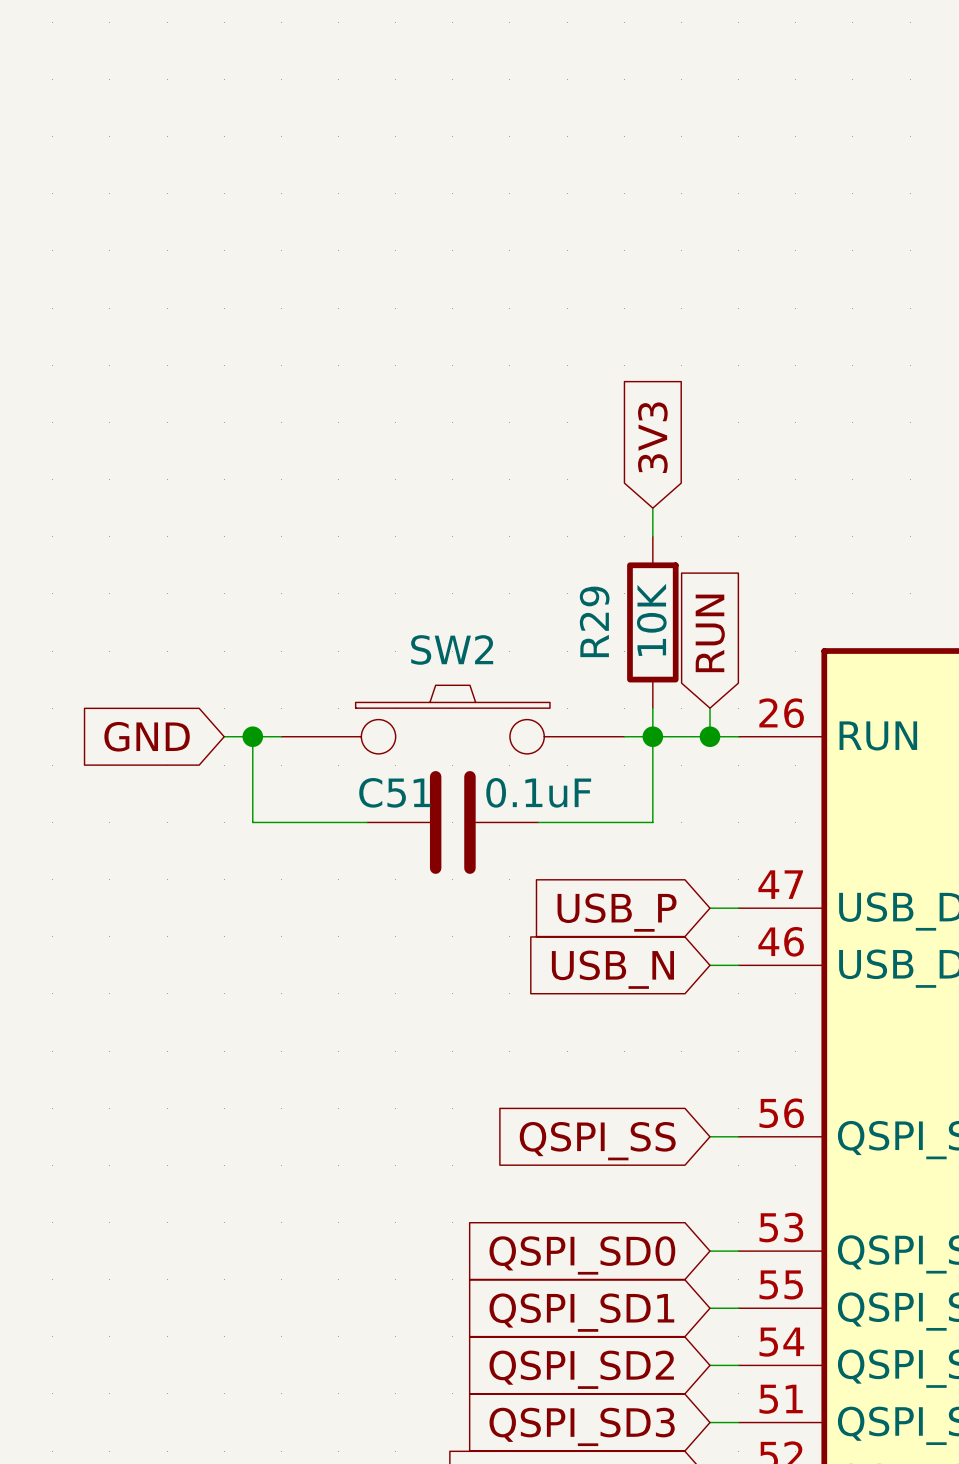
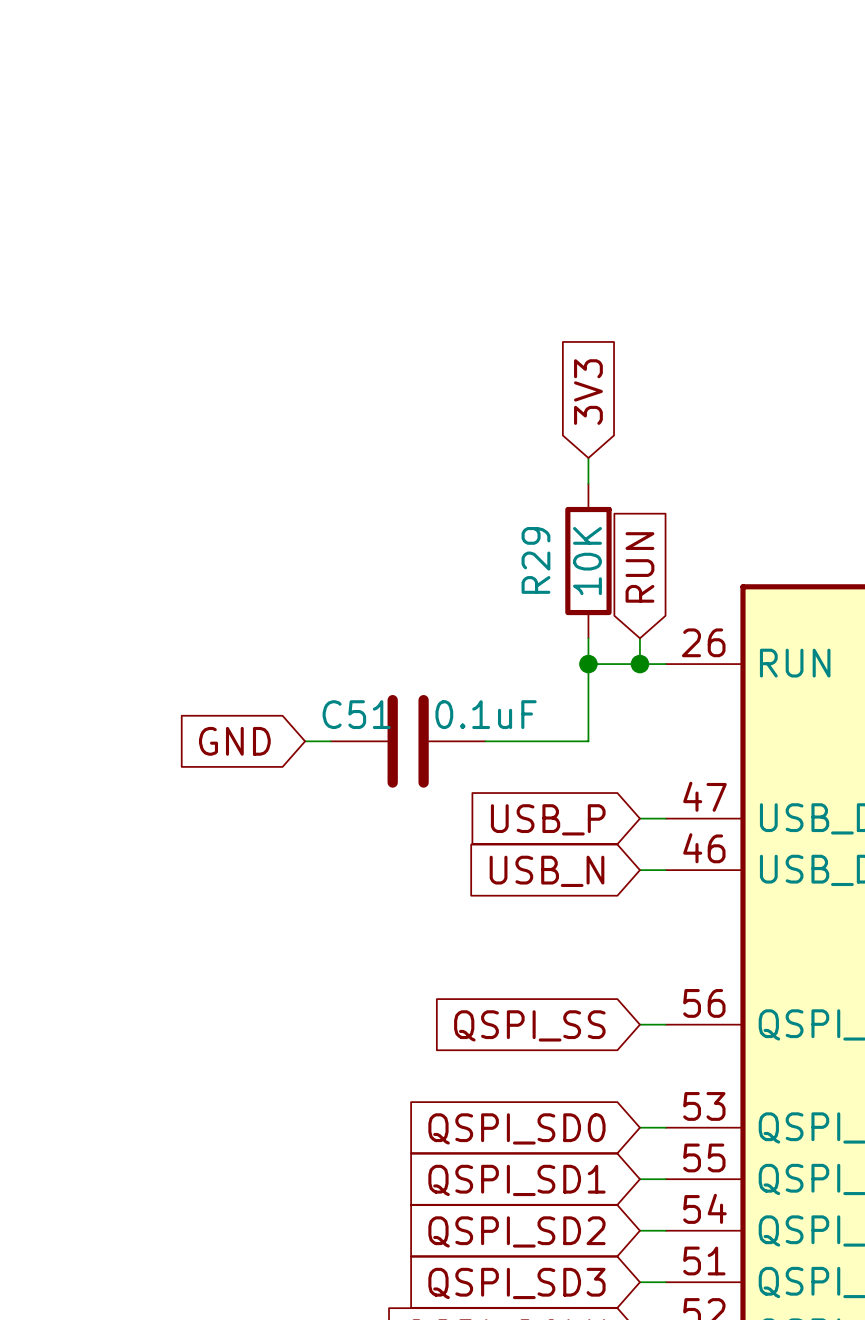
SW2: (452, 719) -> none
global label position: GND (147, 736) -> GND (234, 741)
wire: (224, 736) (281, 736) -> none
wire: (252, 736) (252, 822) (338, 822) -> none
junction: (252, 736) -> none
wire: (624, 736) (652, 736) -> none

